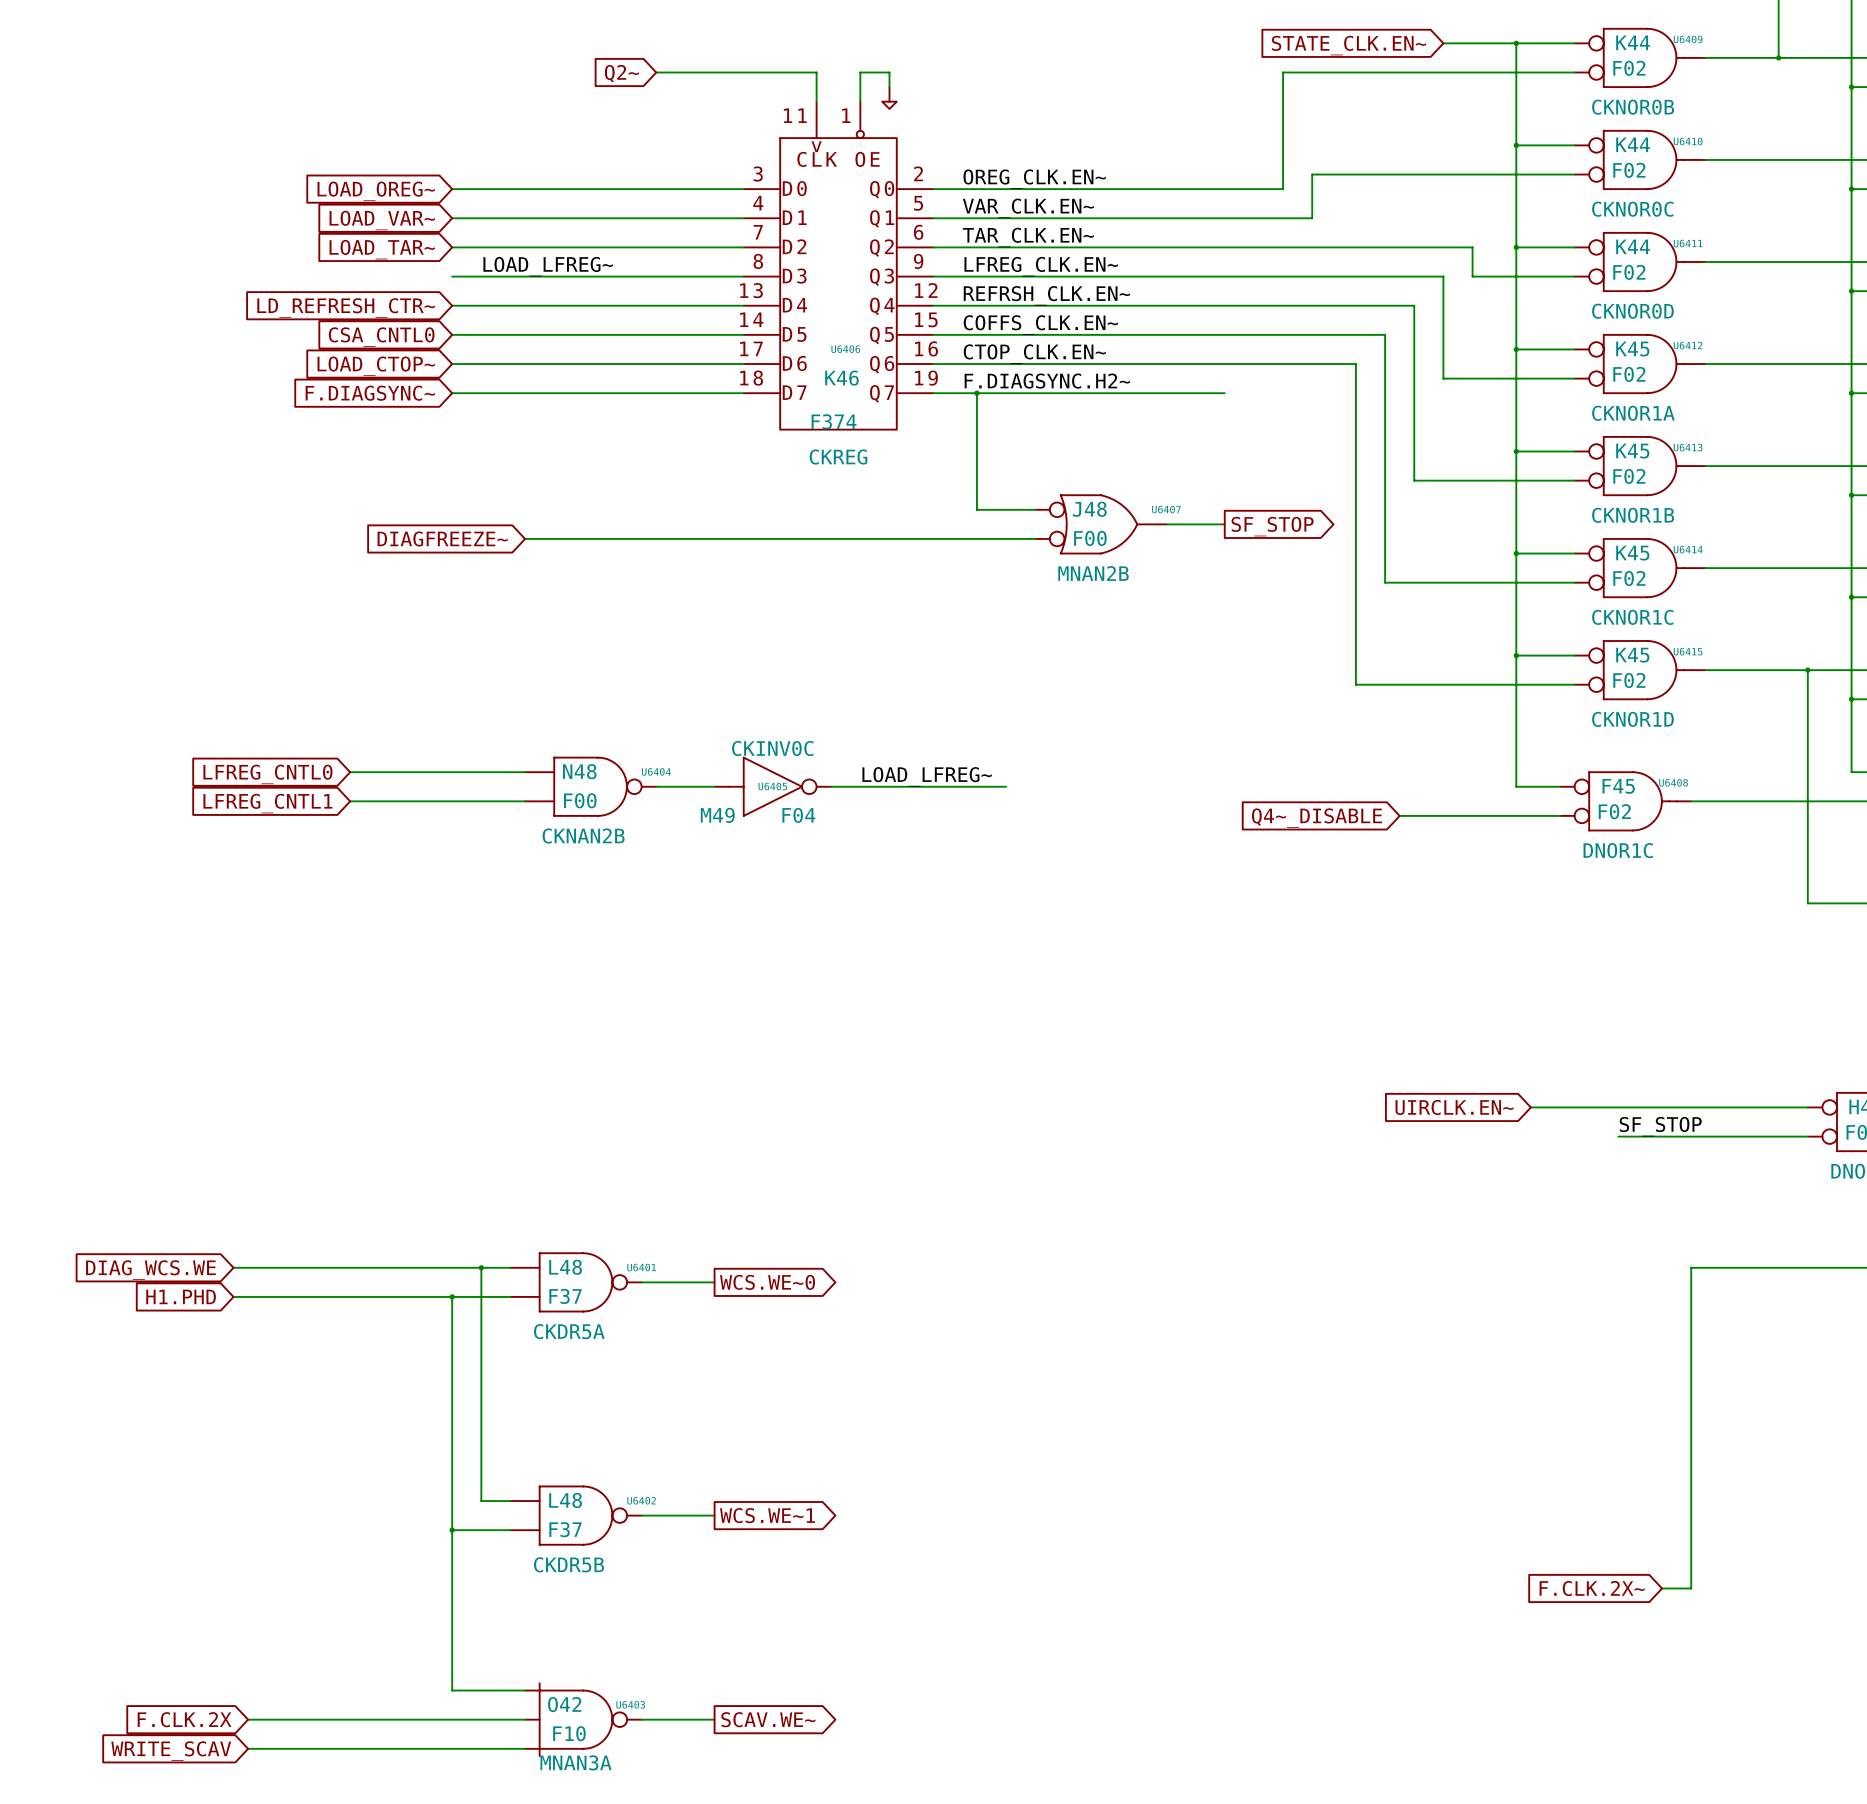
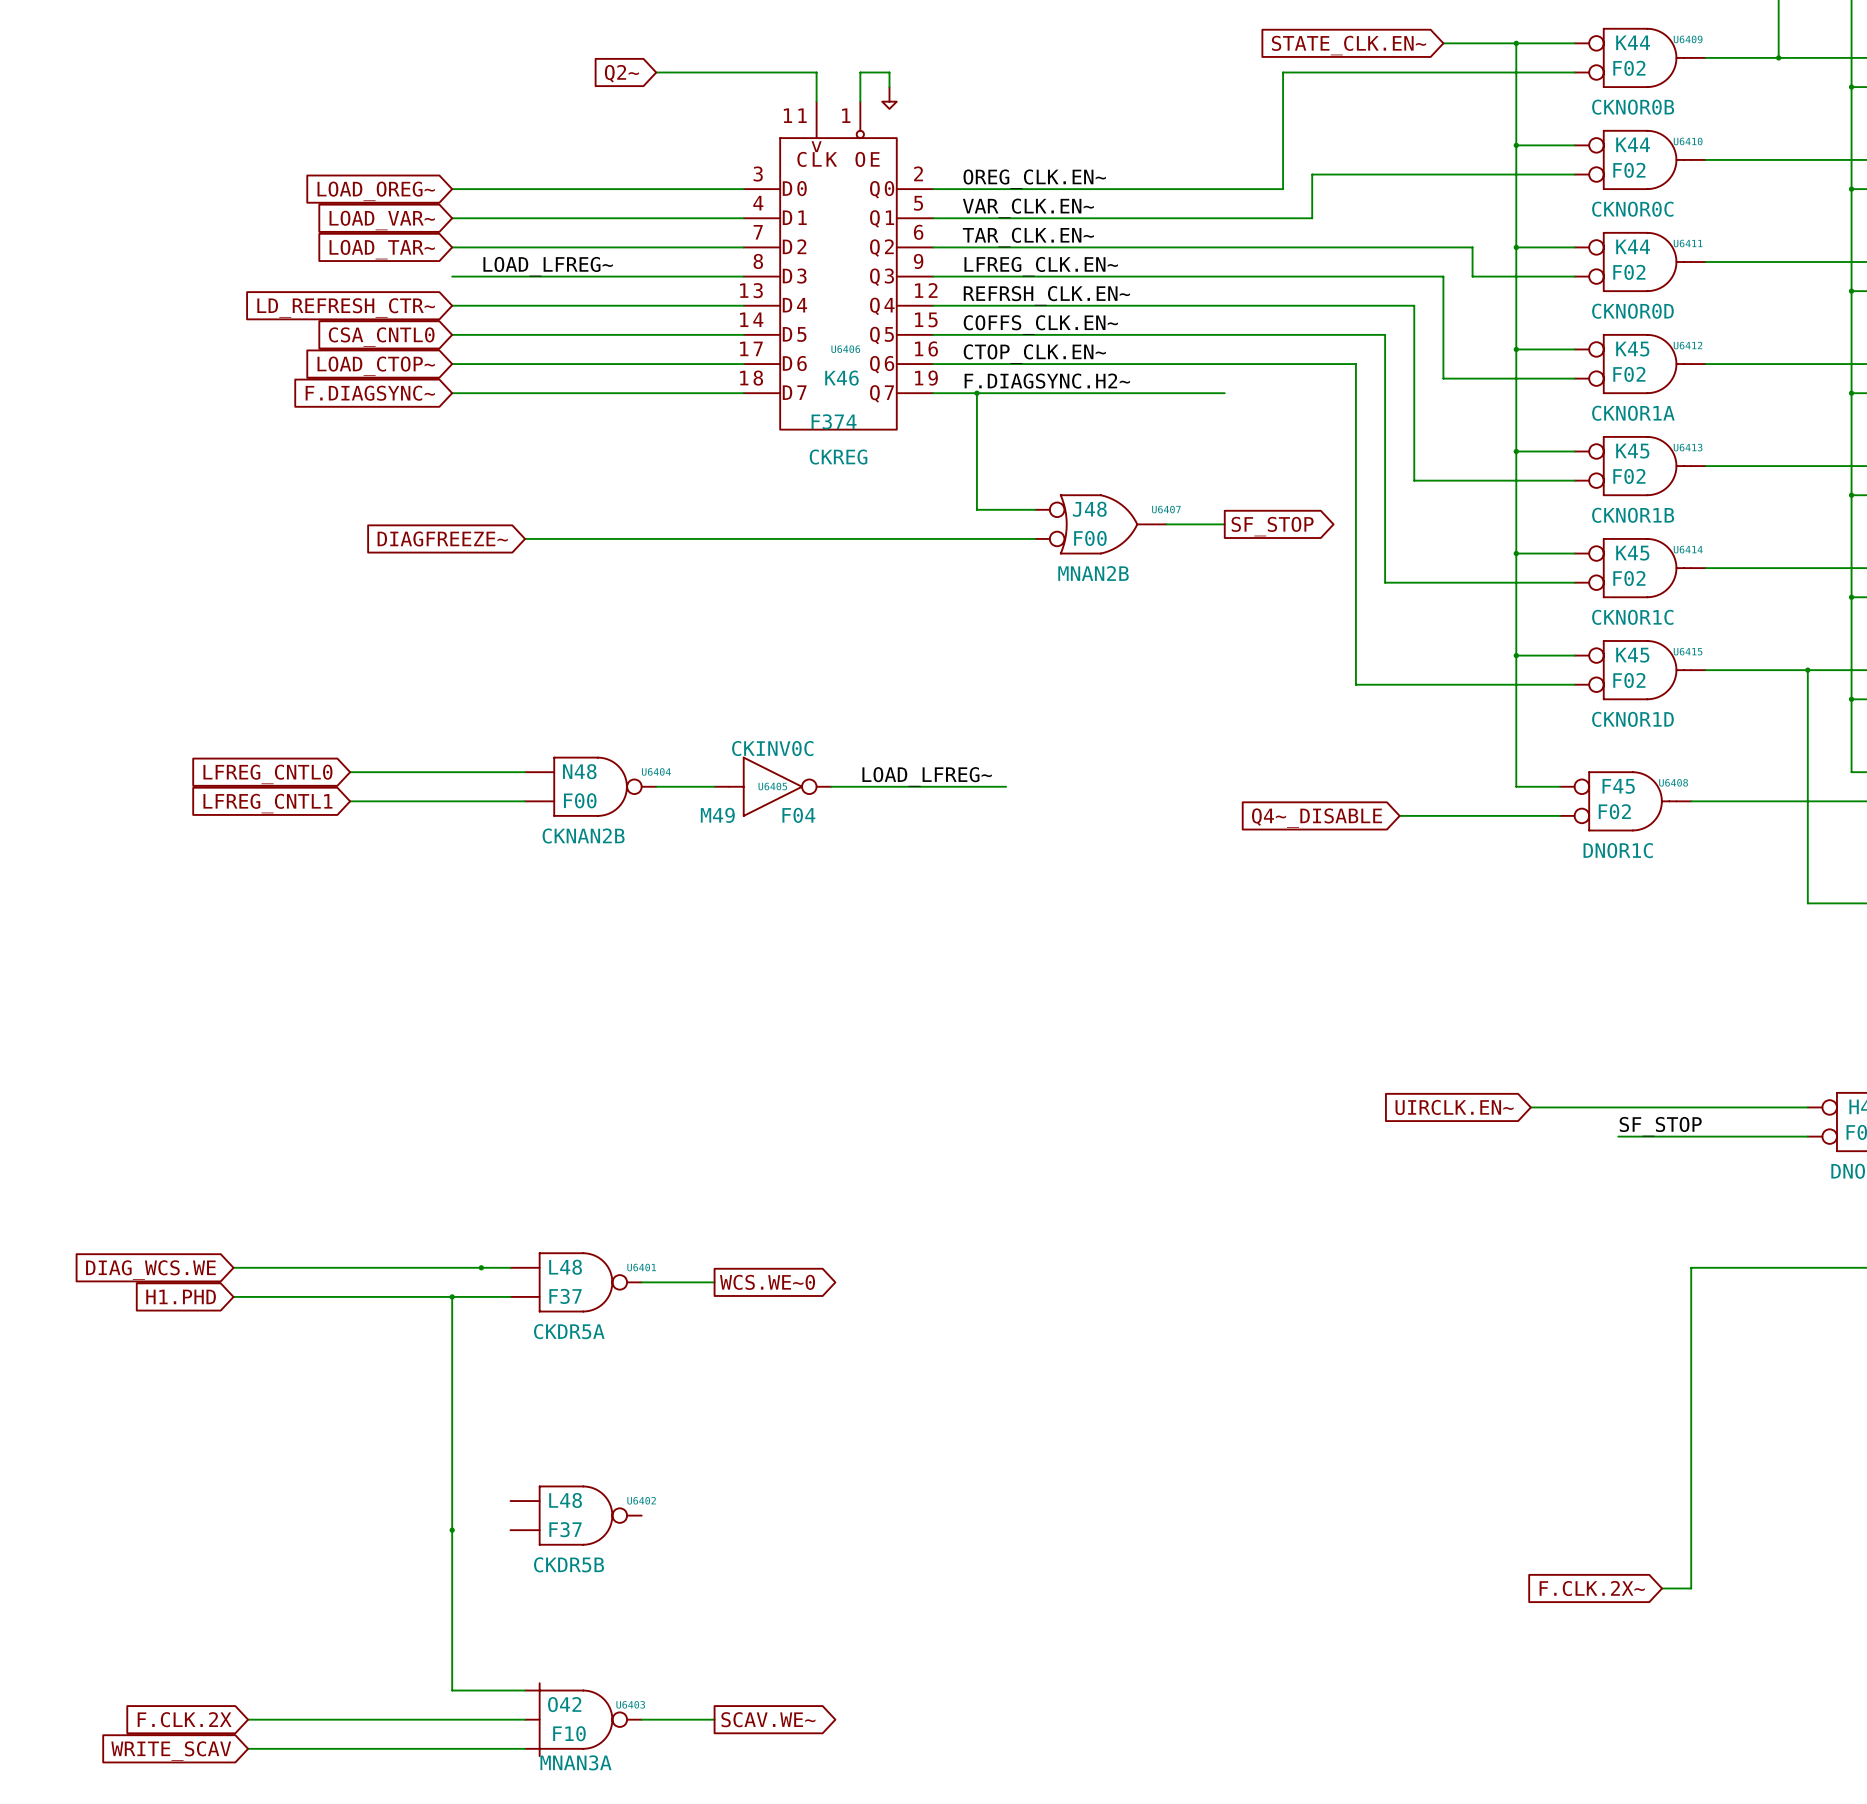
wire: (481, 1267) (481, 1501) (510, 1501) -> none
wire: (641, 1515) (714, 1515) -> none
global label: WCS.WE~1 (767, 1515) -> none
wire: (452, 1530) (510, 1530) -> none

